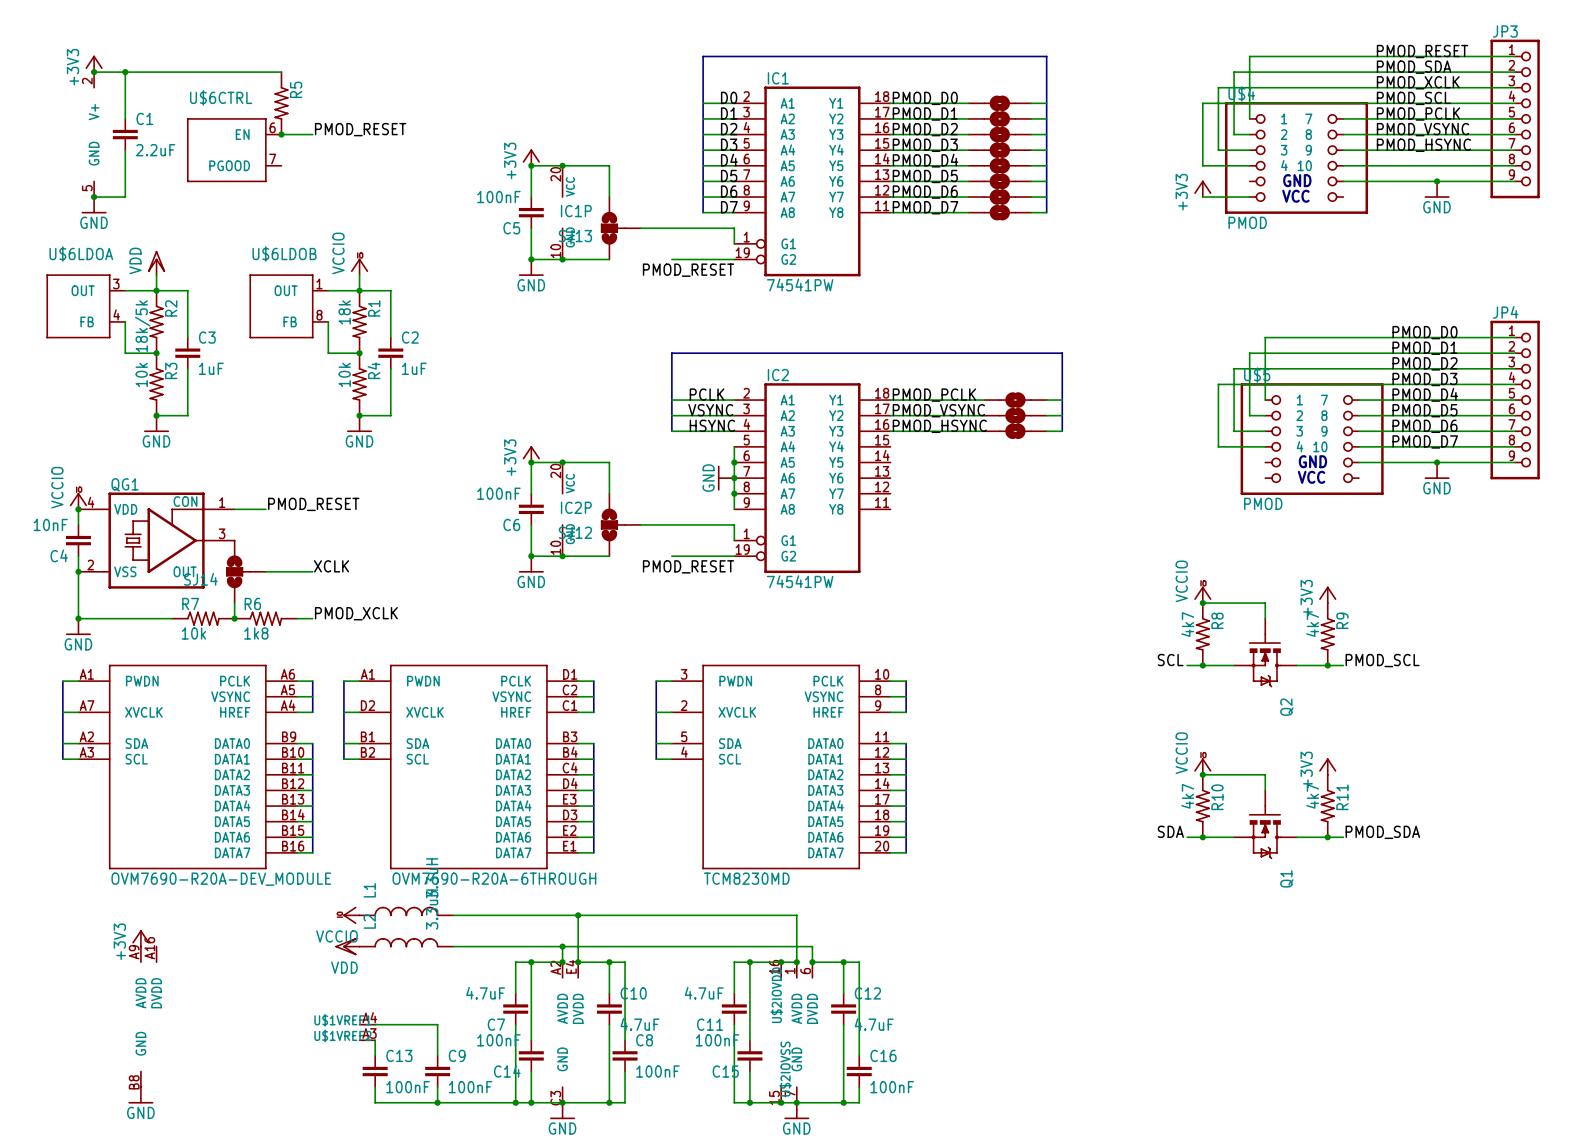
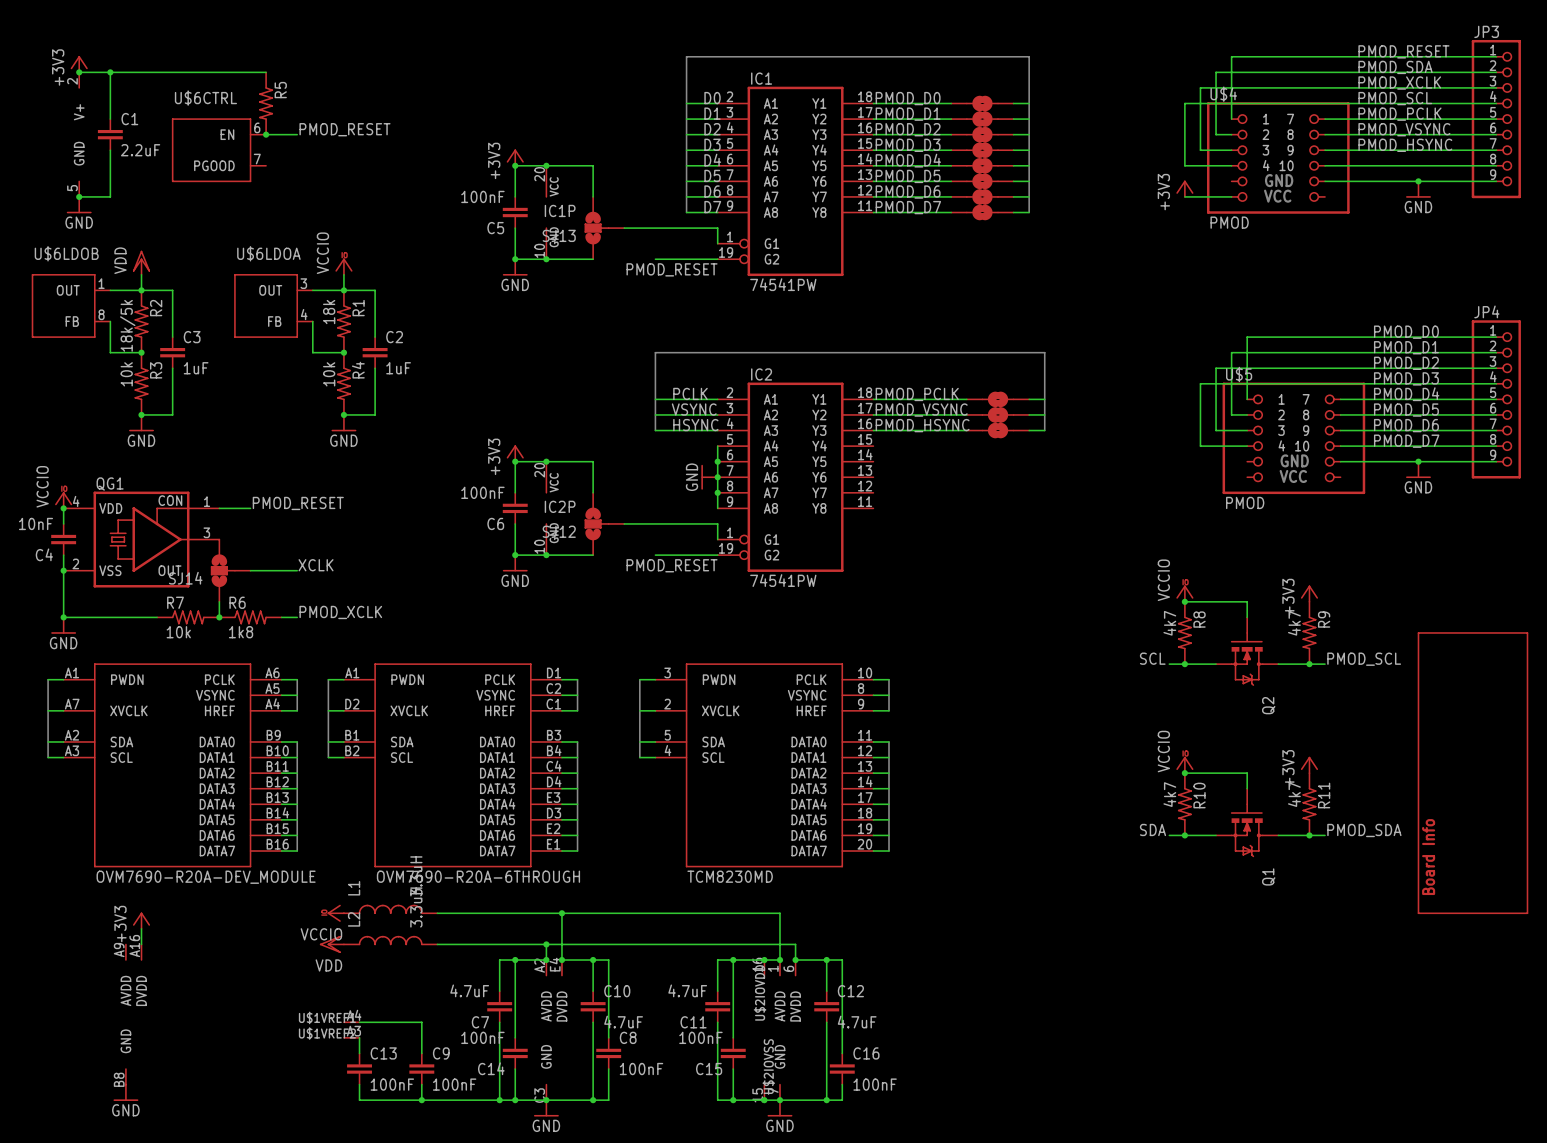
U$6LDOA position: (85, 306) -> (273, 305)
U$6LDOB position: (288, 306) -> (71, 305)
part: none -> (1472, 773)
wire: none -> (141, 928) (141, 944)
power symbol position: +3V3 (140, 938) -> +3V3 (141, 920)

